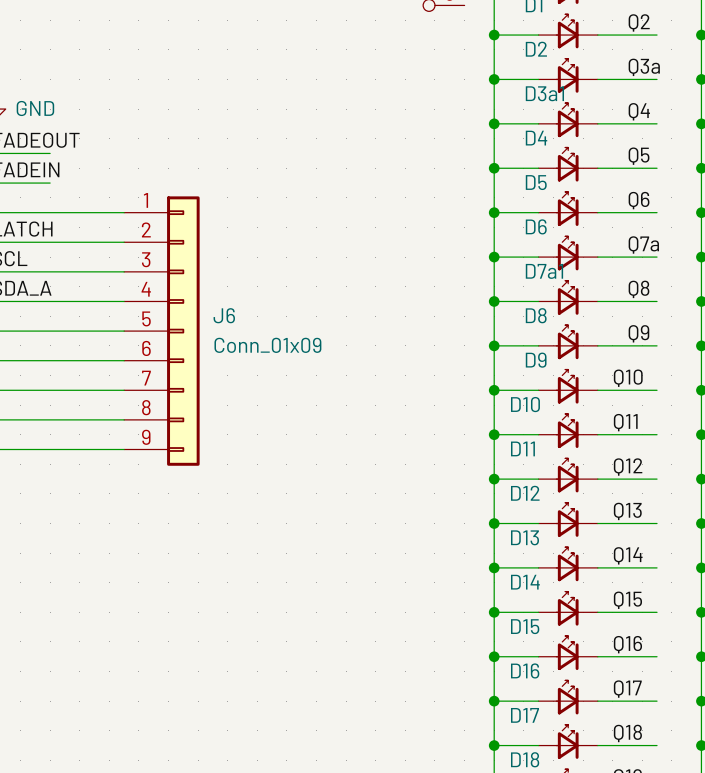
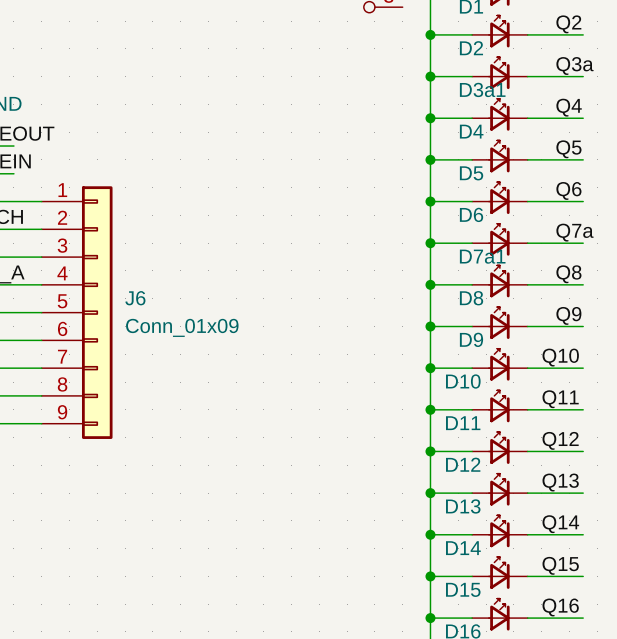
J6 position: (161, 331) -> (77, 312)

